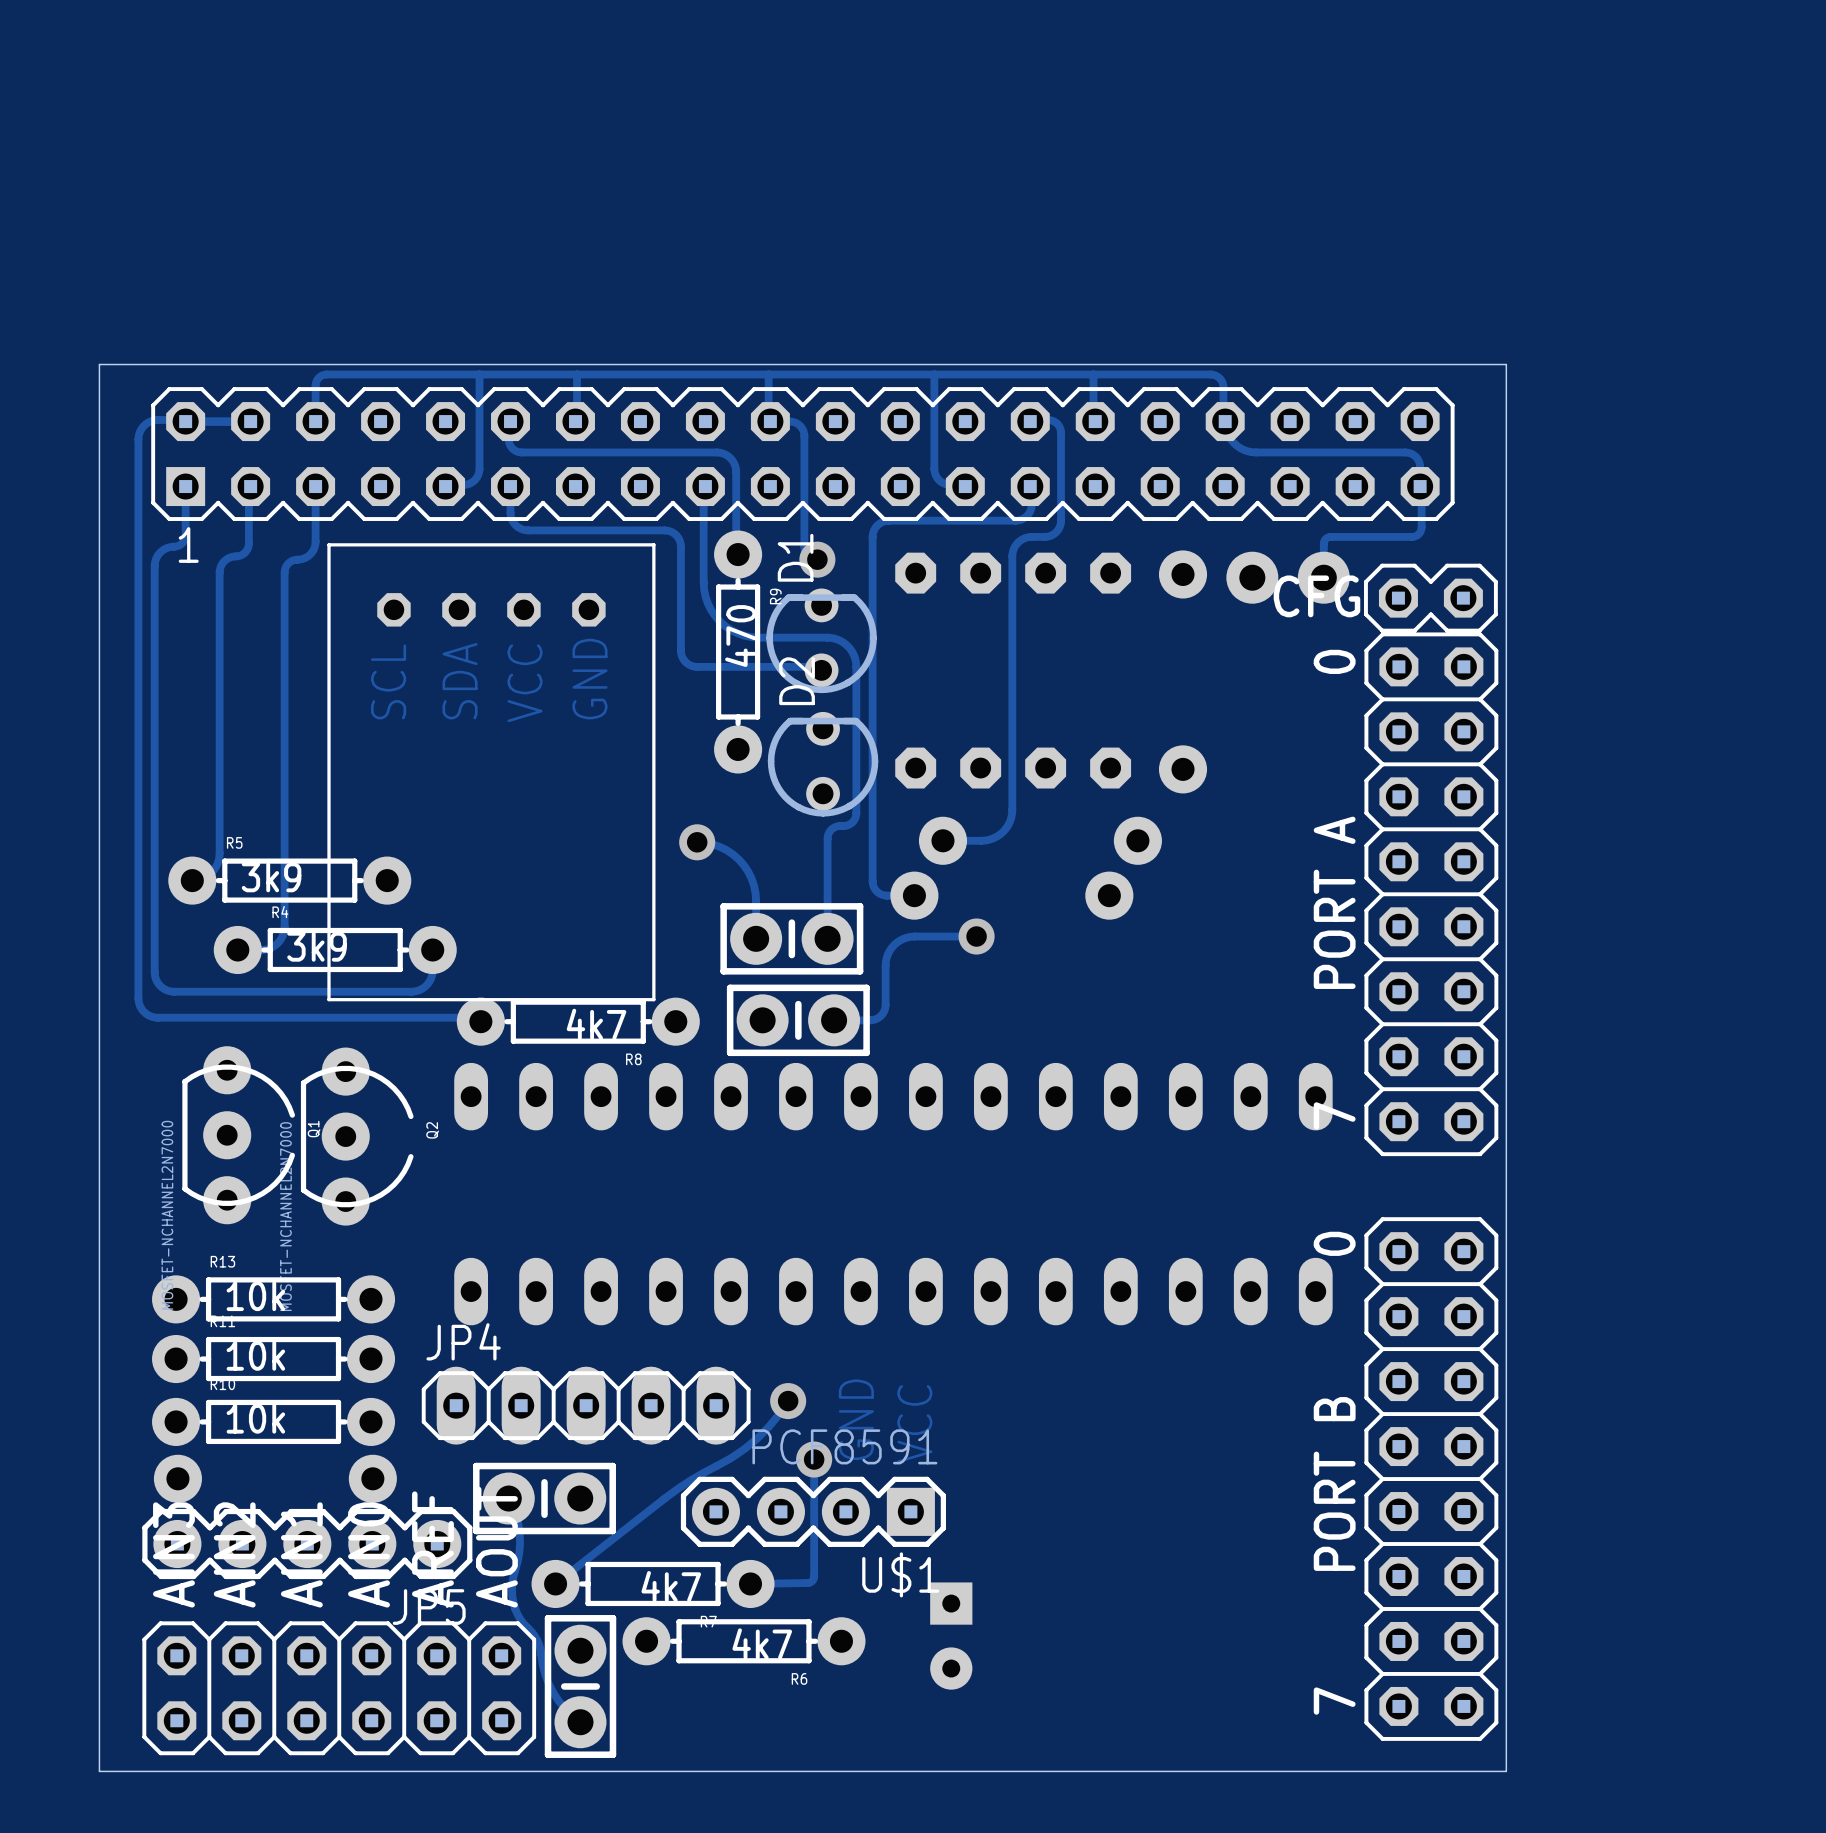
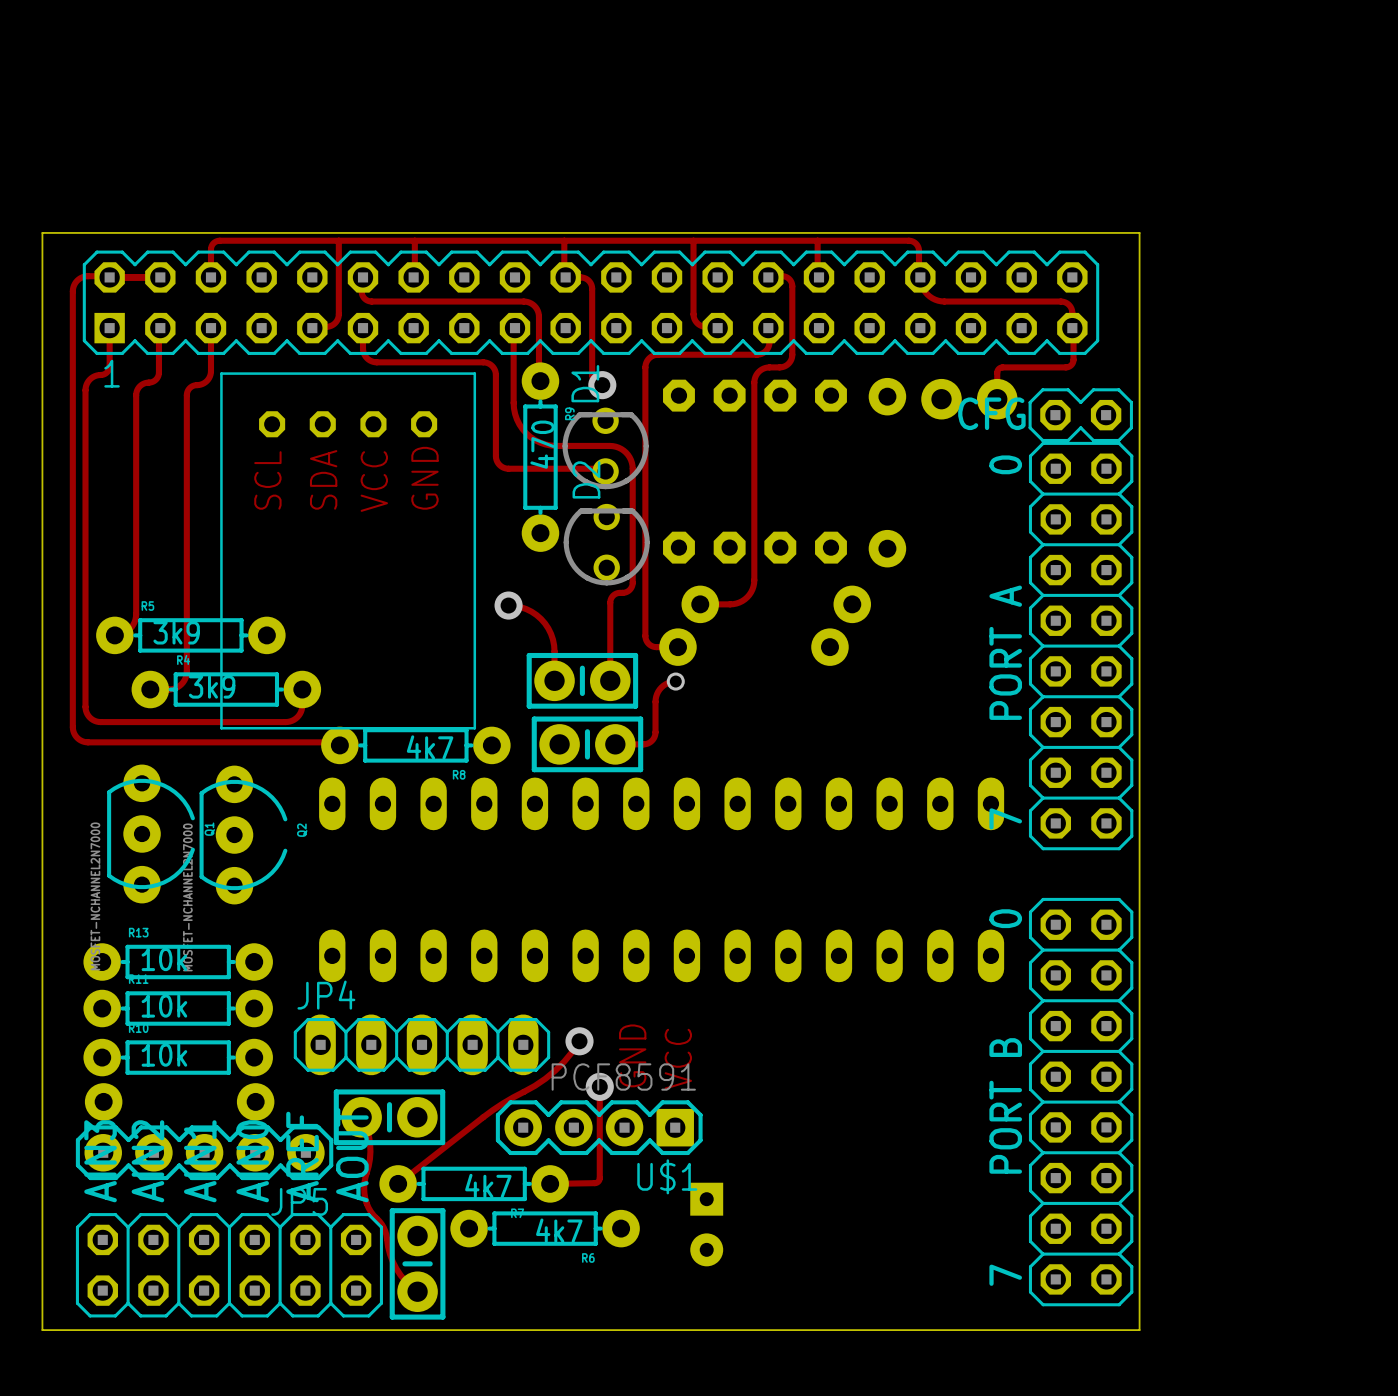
track: (976, 936) (907, 937) (891, 947) (885, 965) -> (675, 681) (668, 683) (661, 687) (657, 694) (655, 701)
via: (976, 936) -> none
via: none -> (675, 681)

